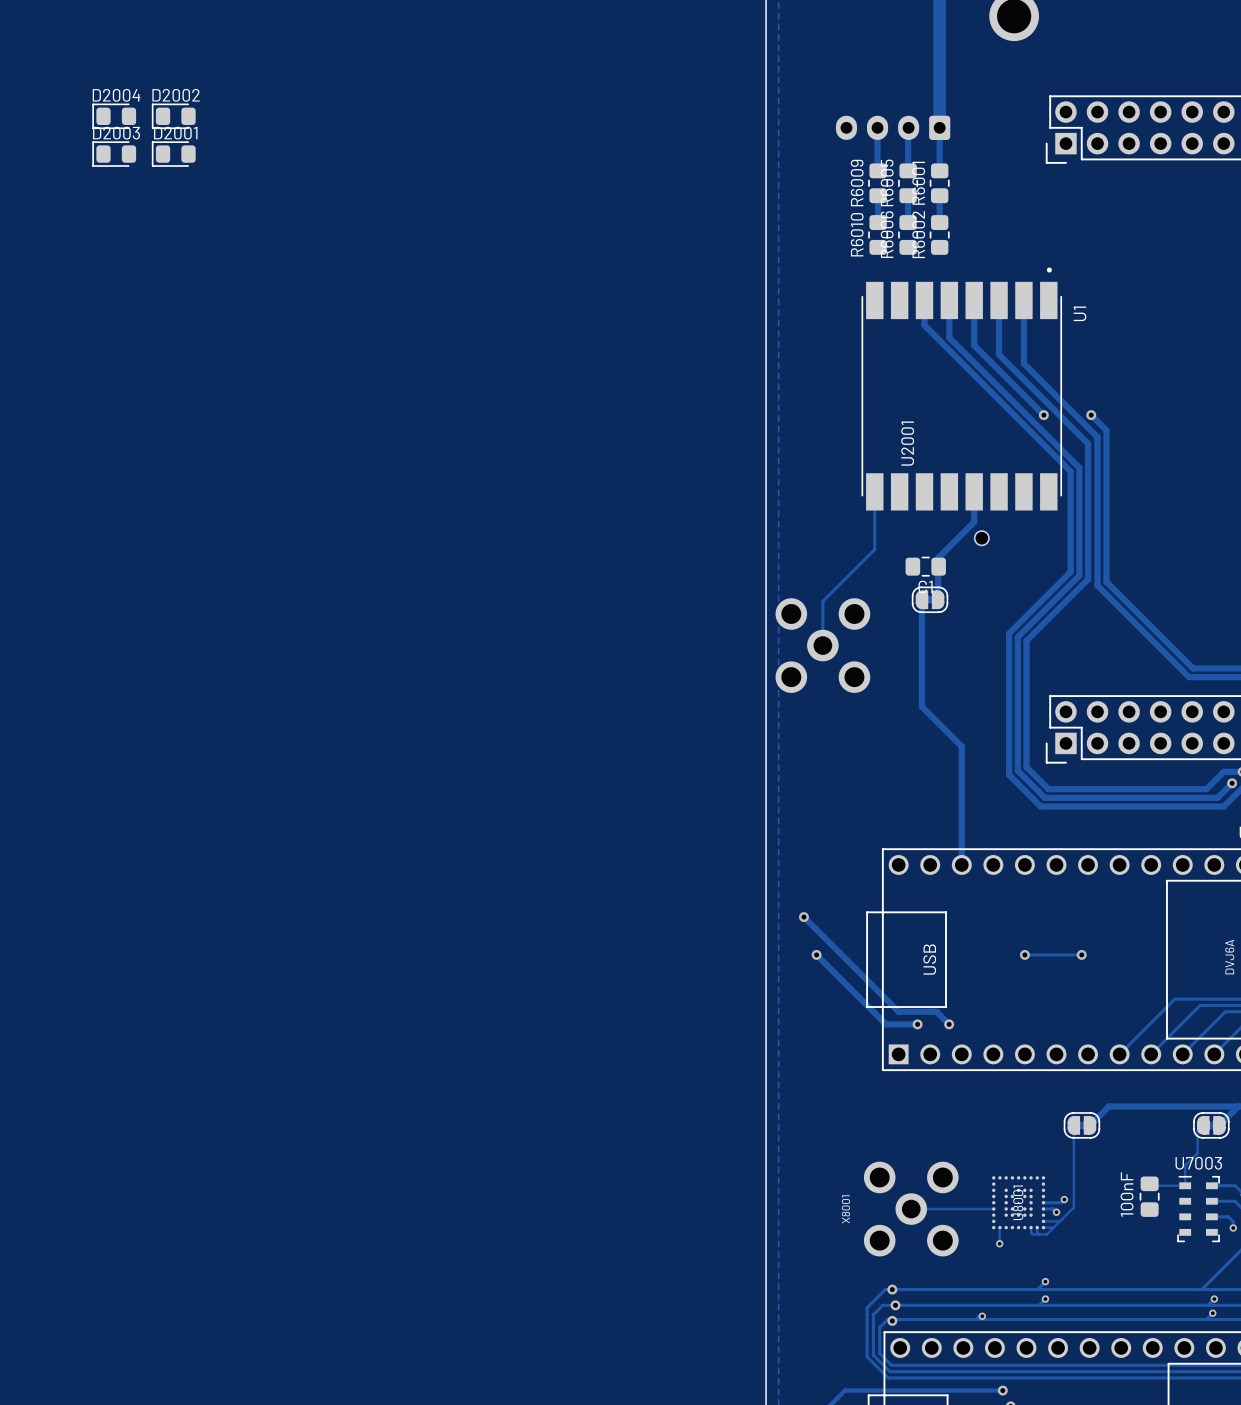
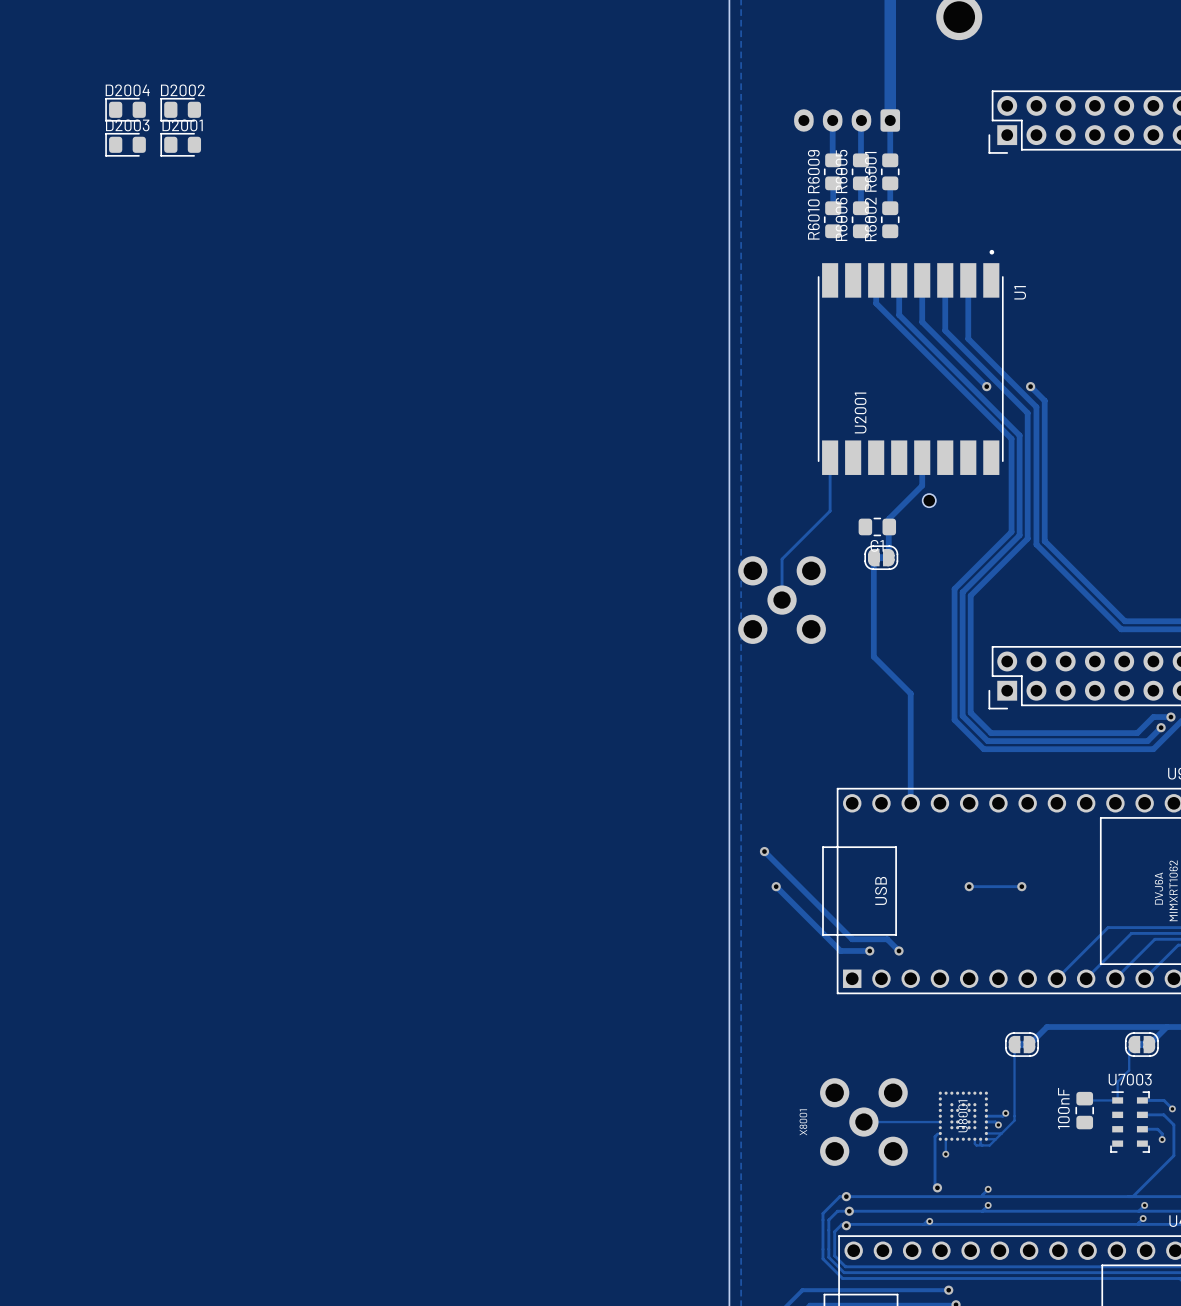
track: none -> (937, 1133) (935, 1136) (935, 1185) (937, 1187)
via: none -> (937, 1187)

